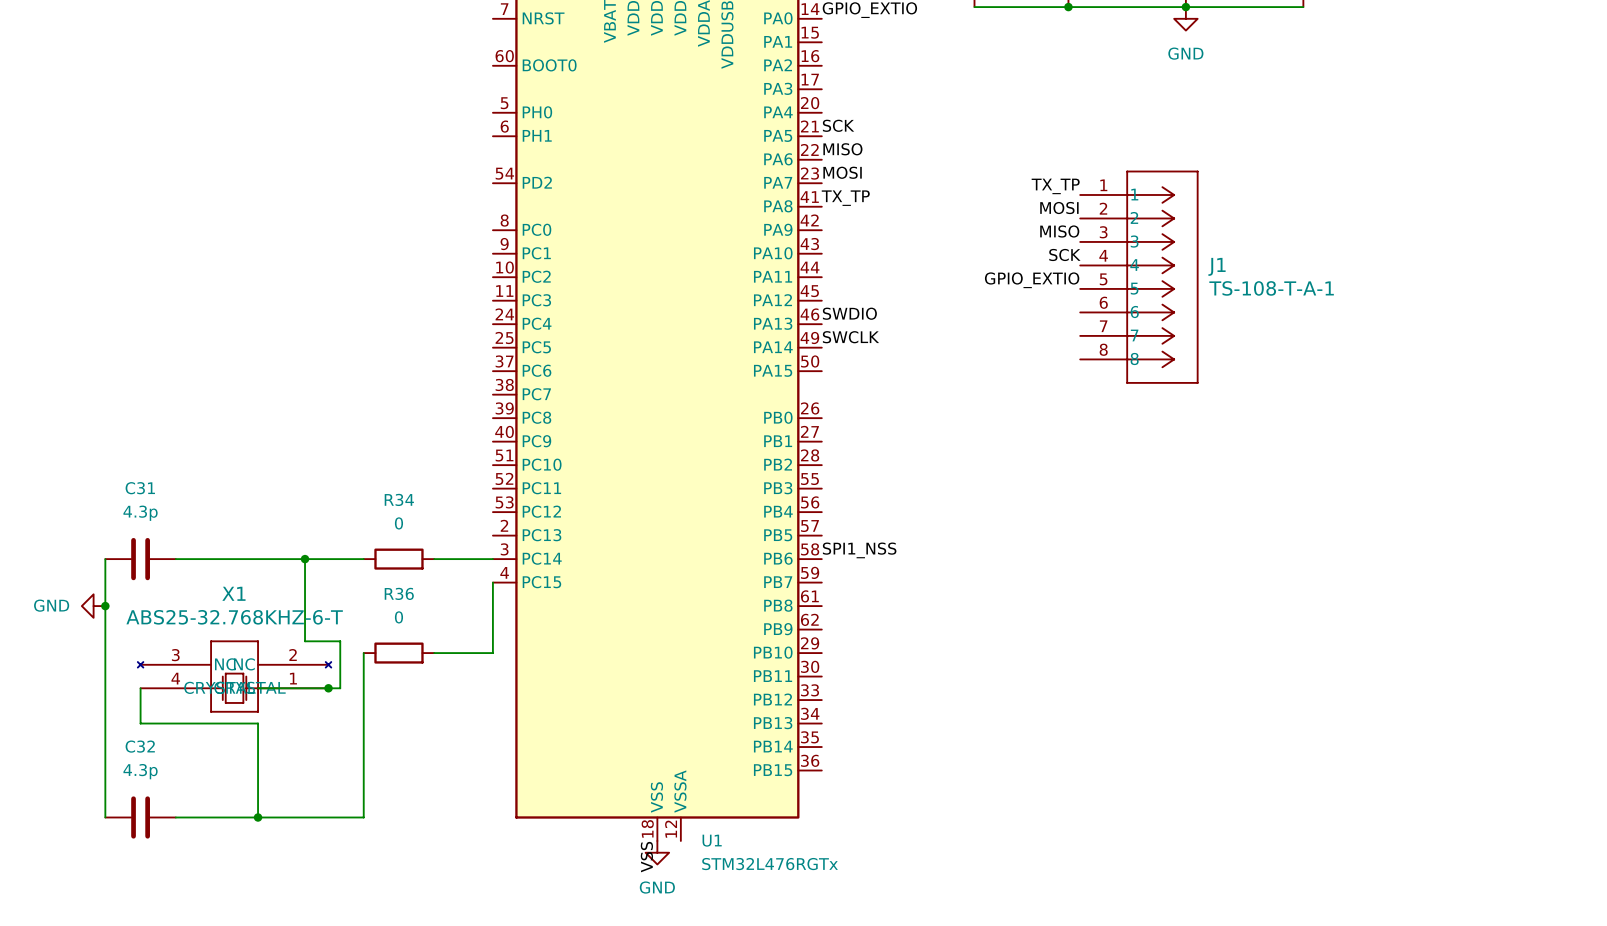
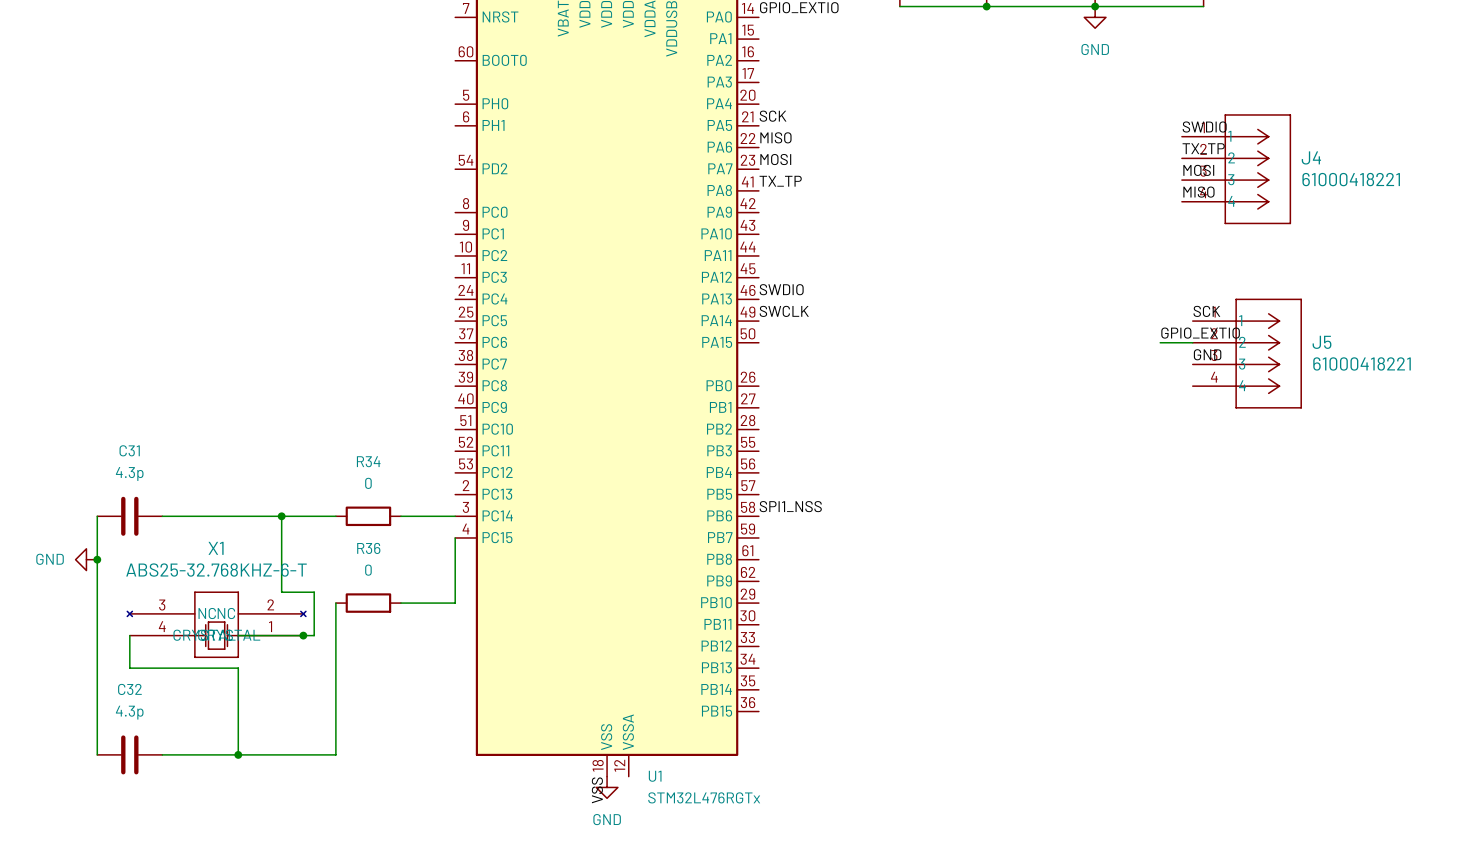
label: none -> SWDIO (1204, 127)
J4: none -> 61000418221 (1236, 169)
label position: TX_TP (1055, 186) -> TX_TP (1203, 148)
label position: MOSI (1059, 208) -> MOSI (1198, 170)
label position: MISO (1059, 231) -> MISO (1198, 192)
label position: SCK (1064, 254) -> SCK (1206, 311)
J1: TS-108-T-A-1 (1139, 277) -> none
label position: GPIO_EXTIO (1032, 280) -> GPIO_EXTIO (1200, 333)
wire: none -> (1160, 342) (1192, 342)
J5: none -> 61000418221 (1247, 353)
label: none -> GND (1207, 354)

